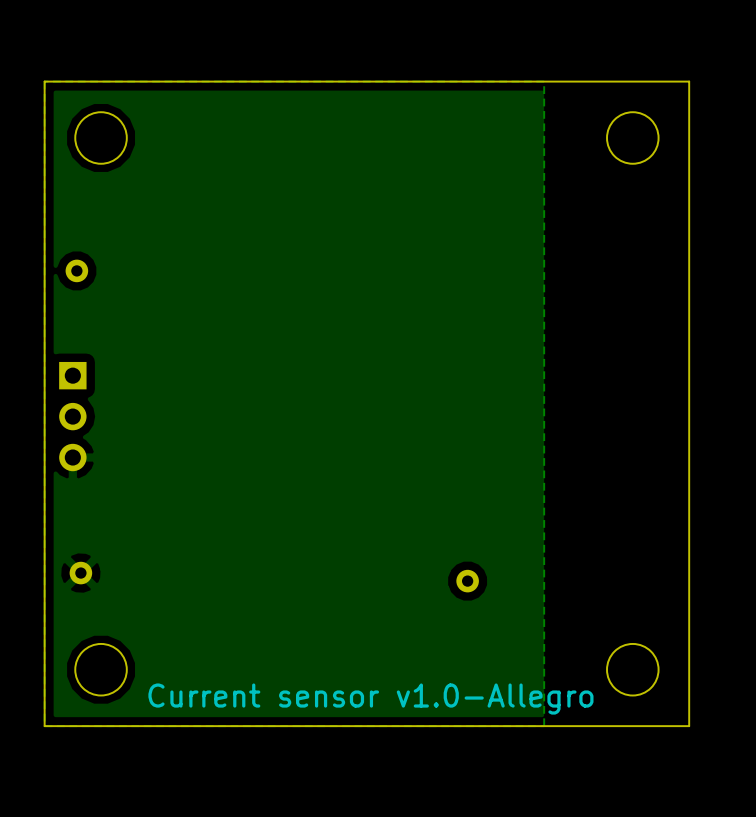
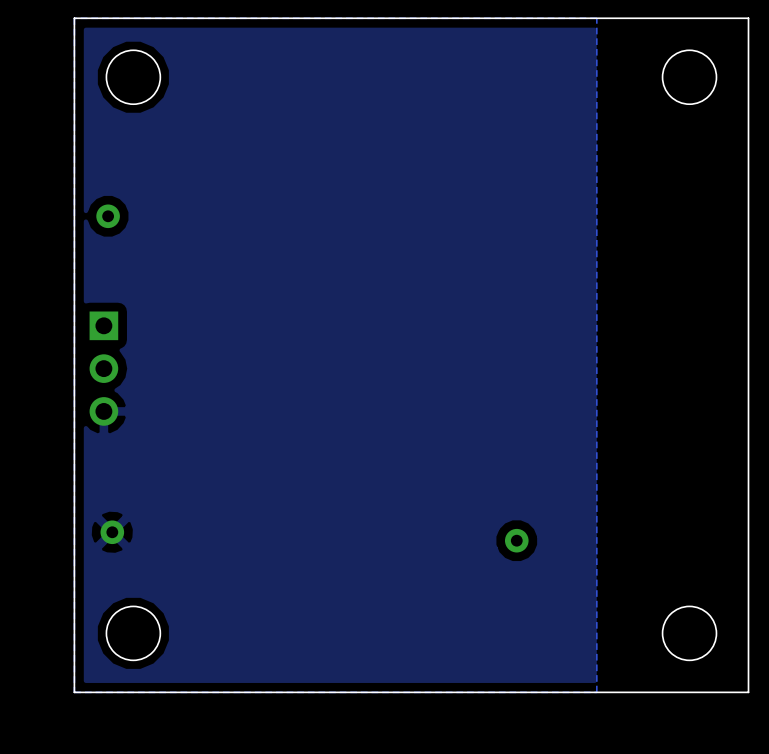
text: Current sensor v1.0-Allegro (370, 699) -> none

